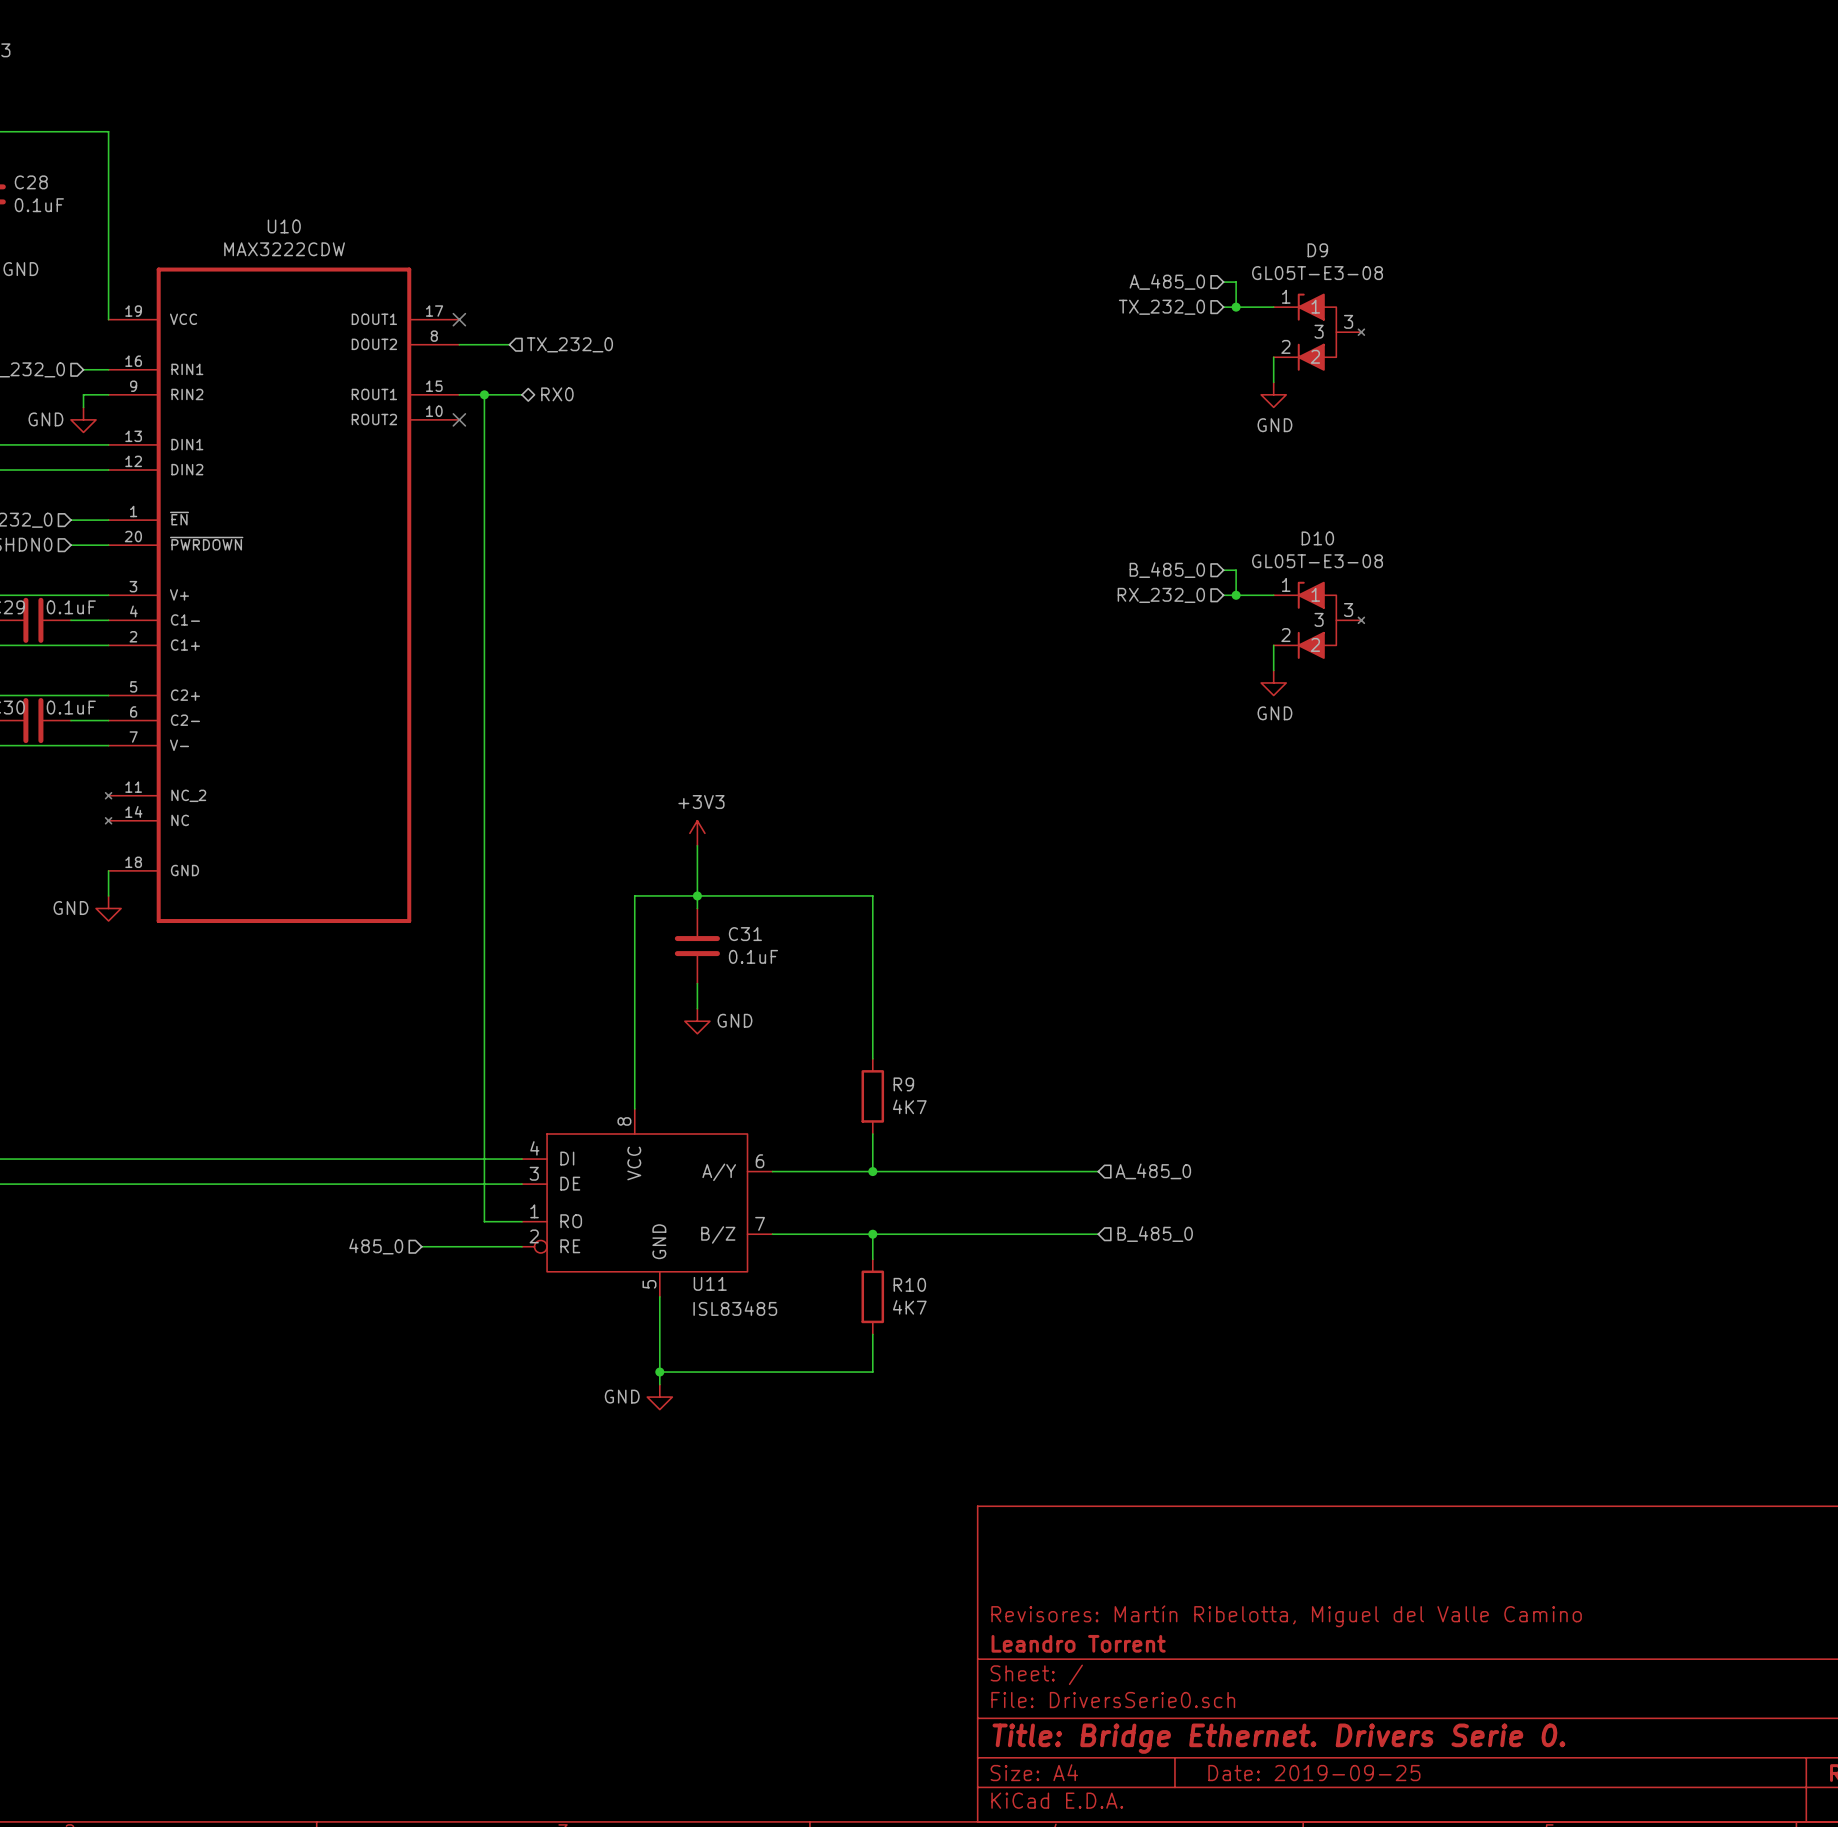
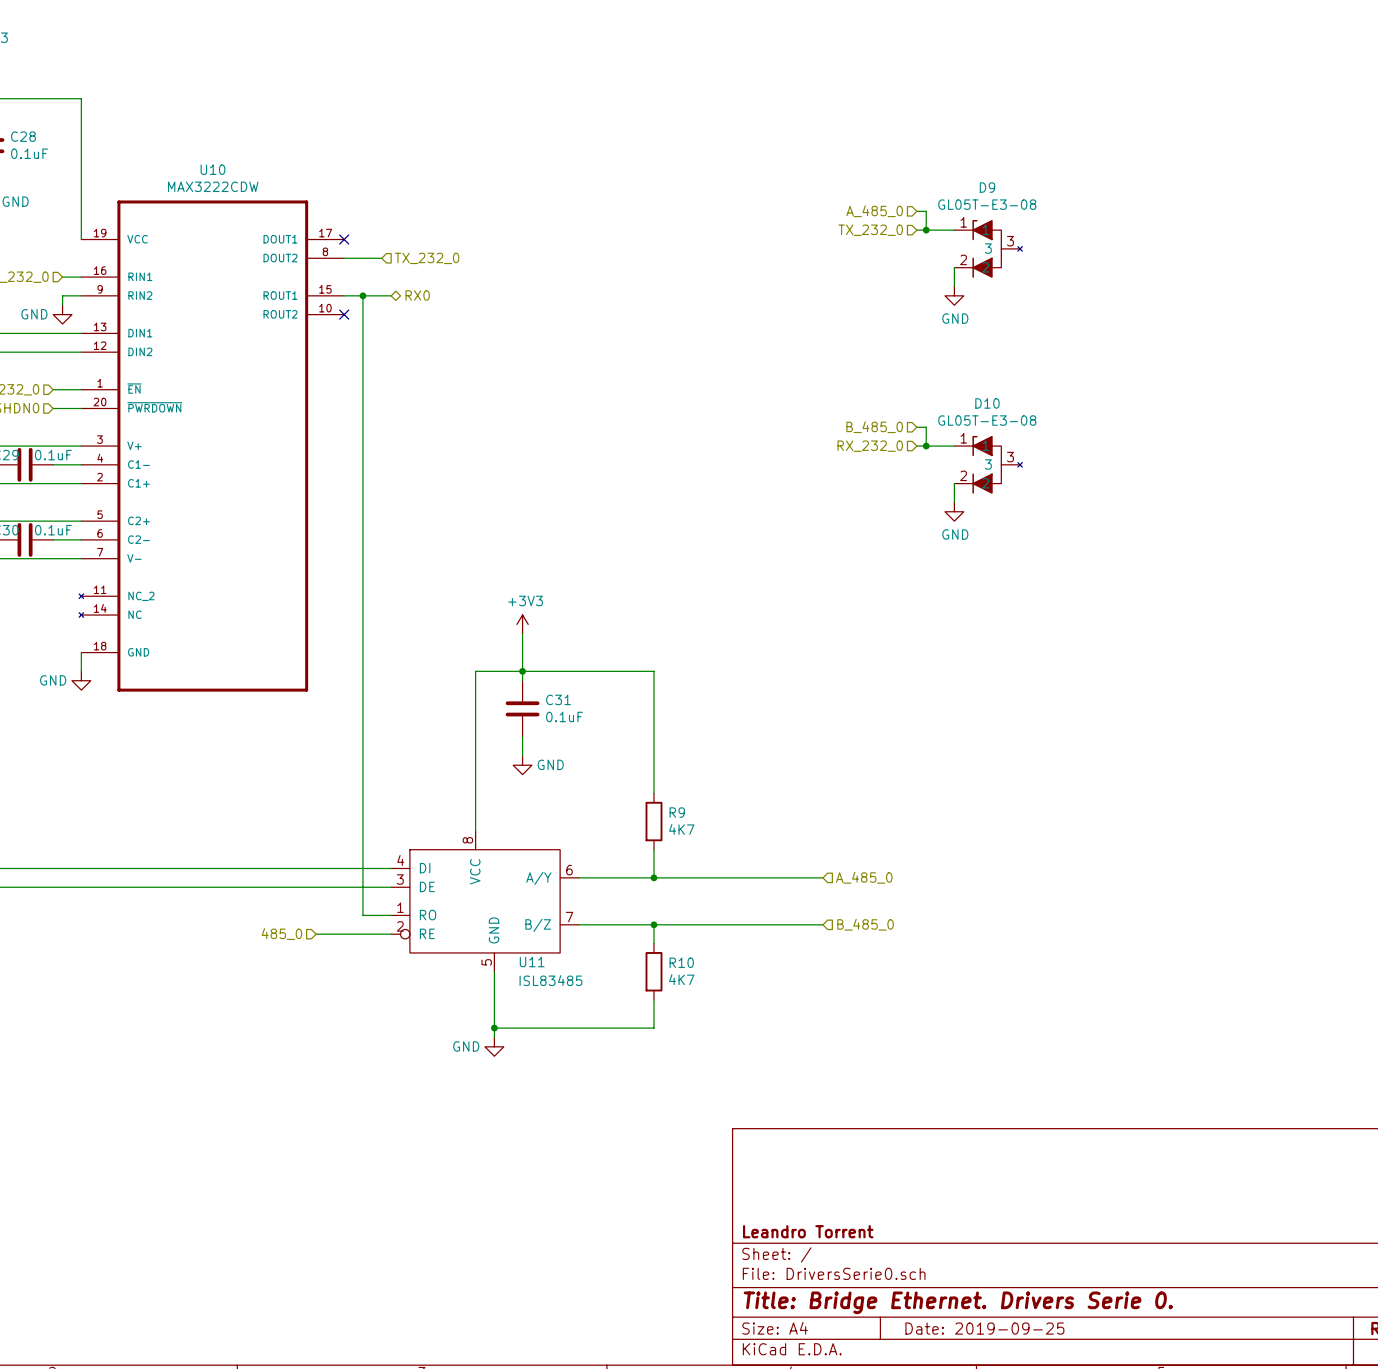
title block: Revisores: Martín Ribelotta, Miguel del Valle Camino (1286, 1616) -> none

